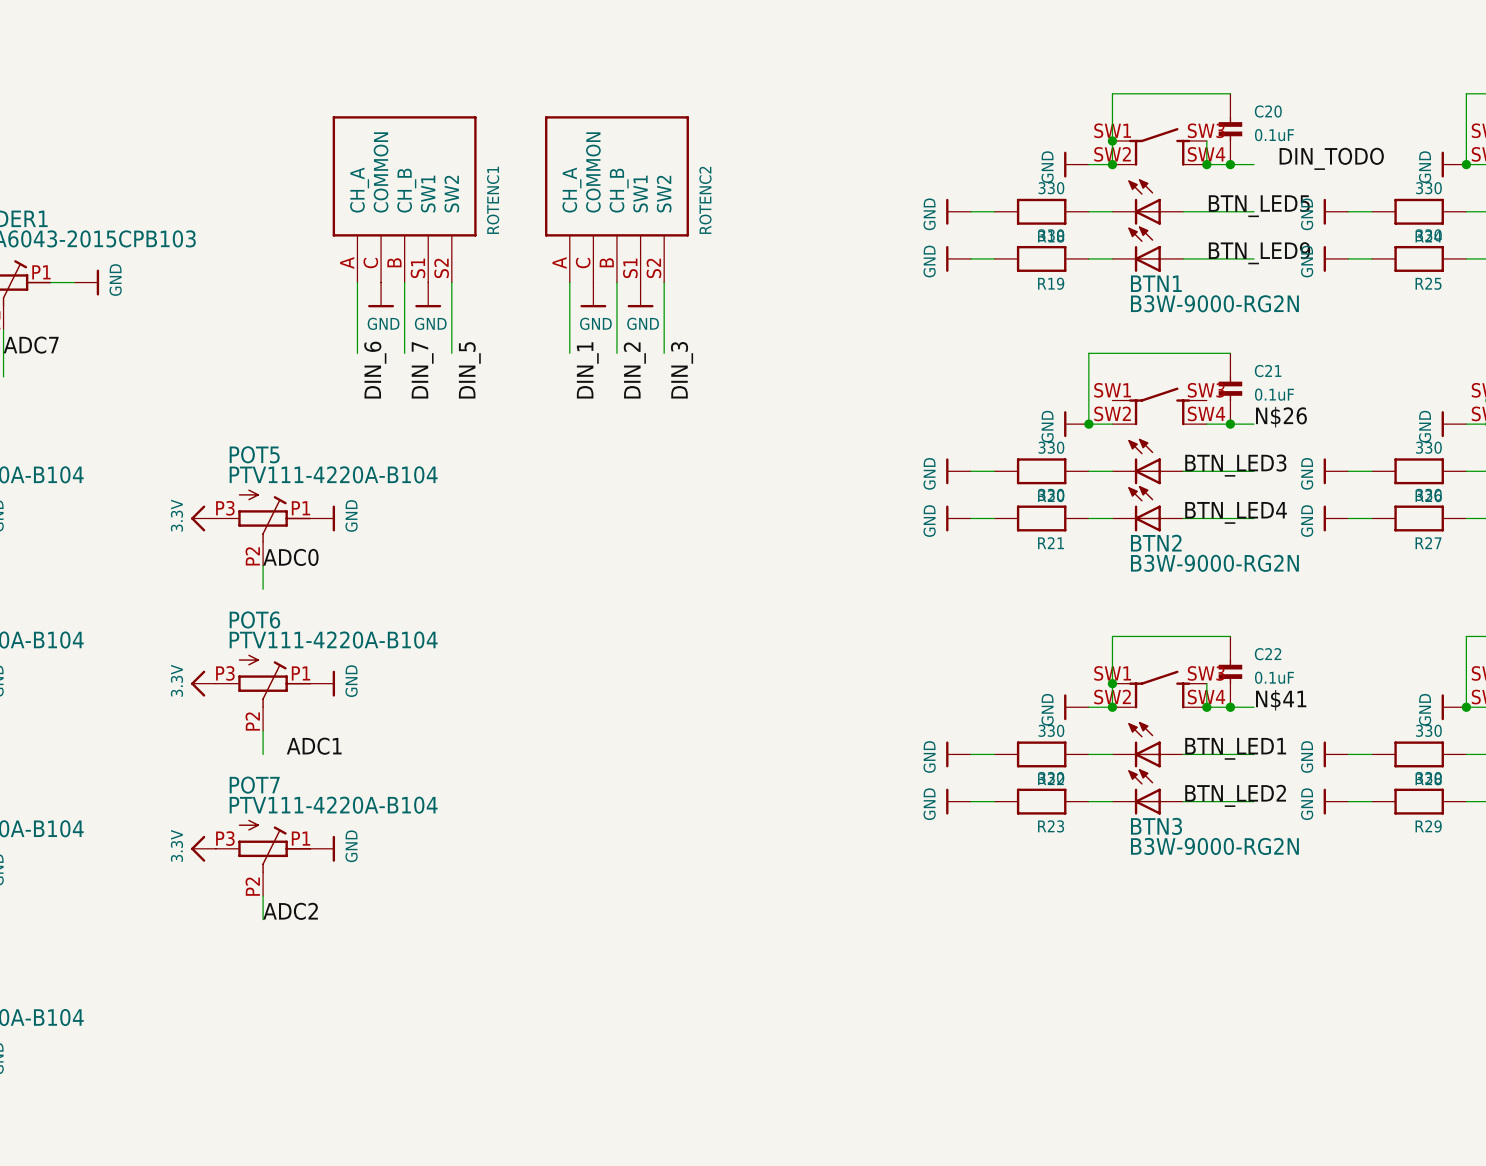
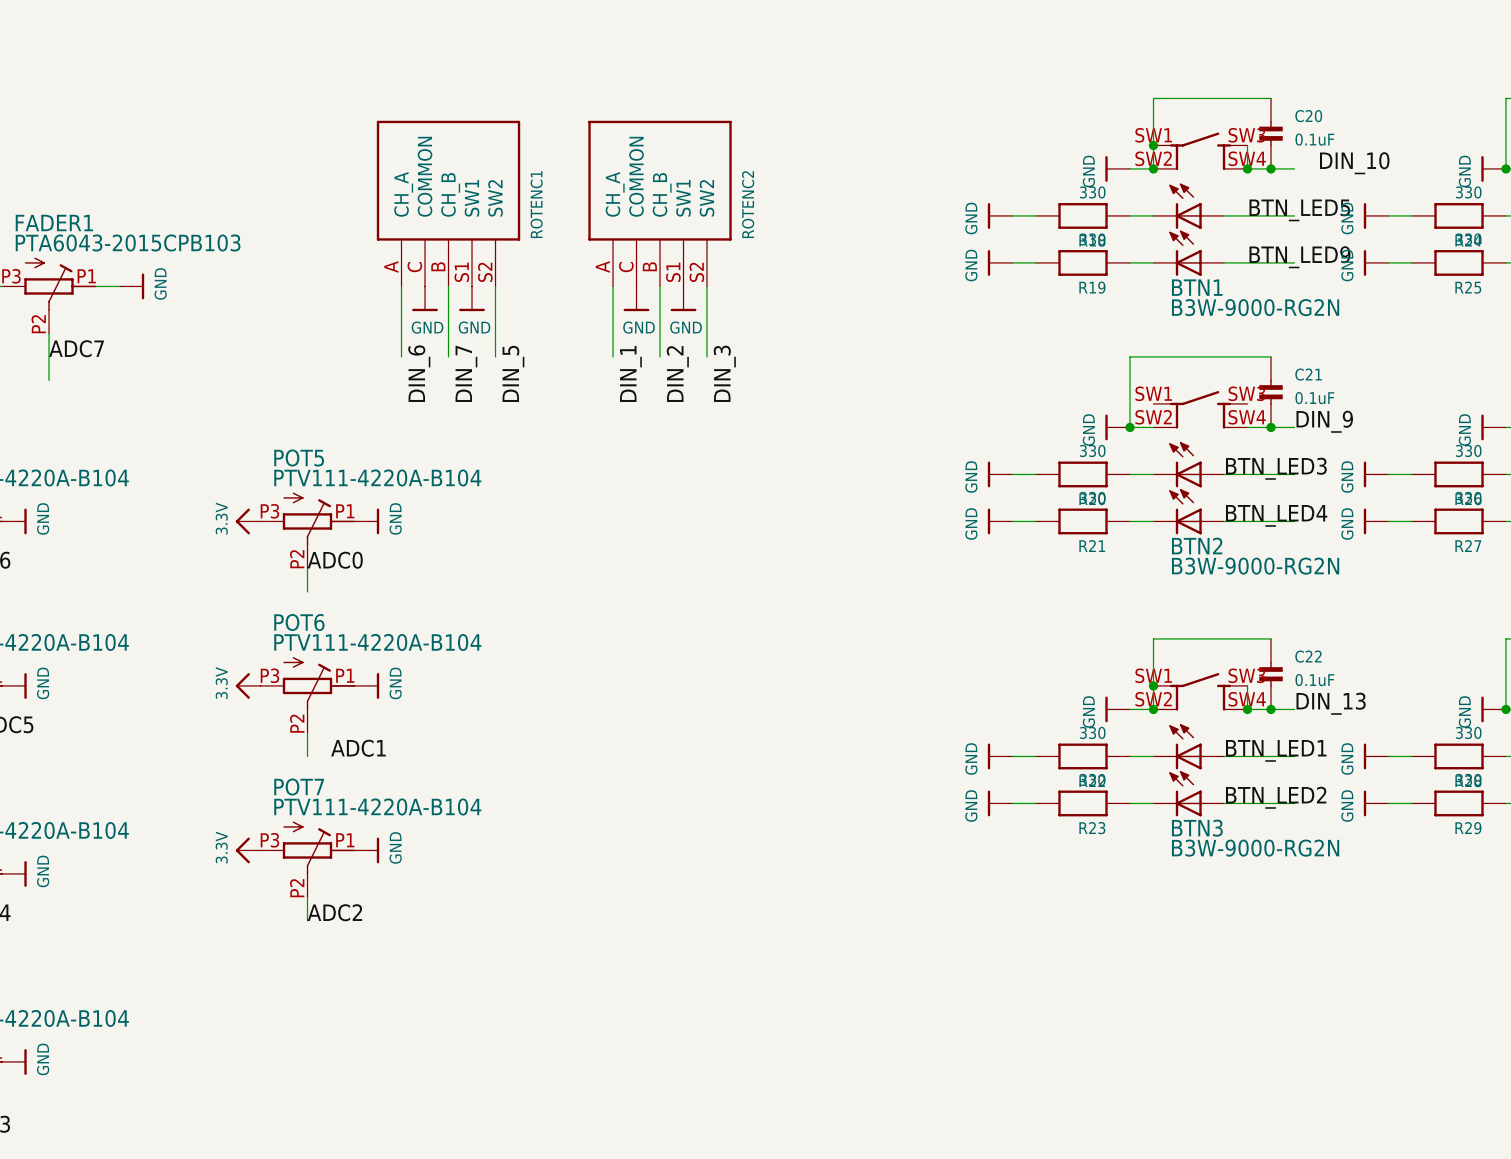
label: DIN_TODO (1331, 158) -> DIN_10 (1354, 163)
label: N$26 (1281, 417) -> DIN_9 (1324, 421)
label: N$41 (1281, 700) -> DIN_13 (1331, 703)

